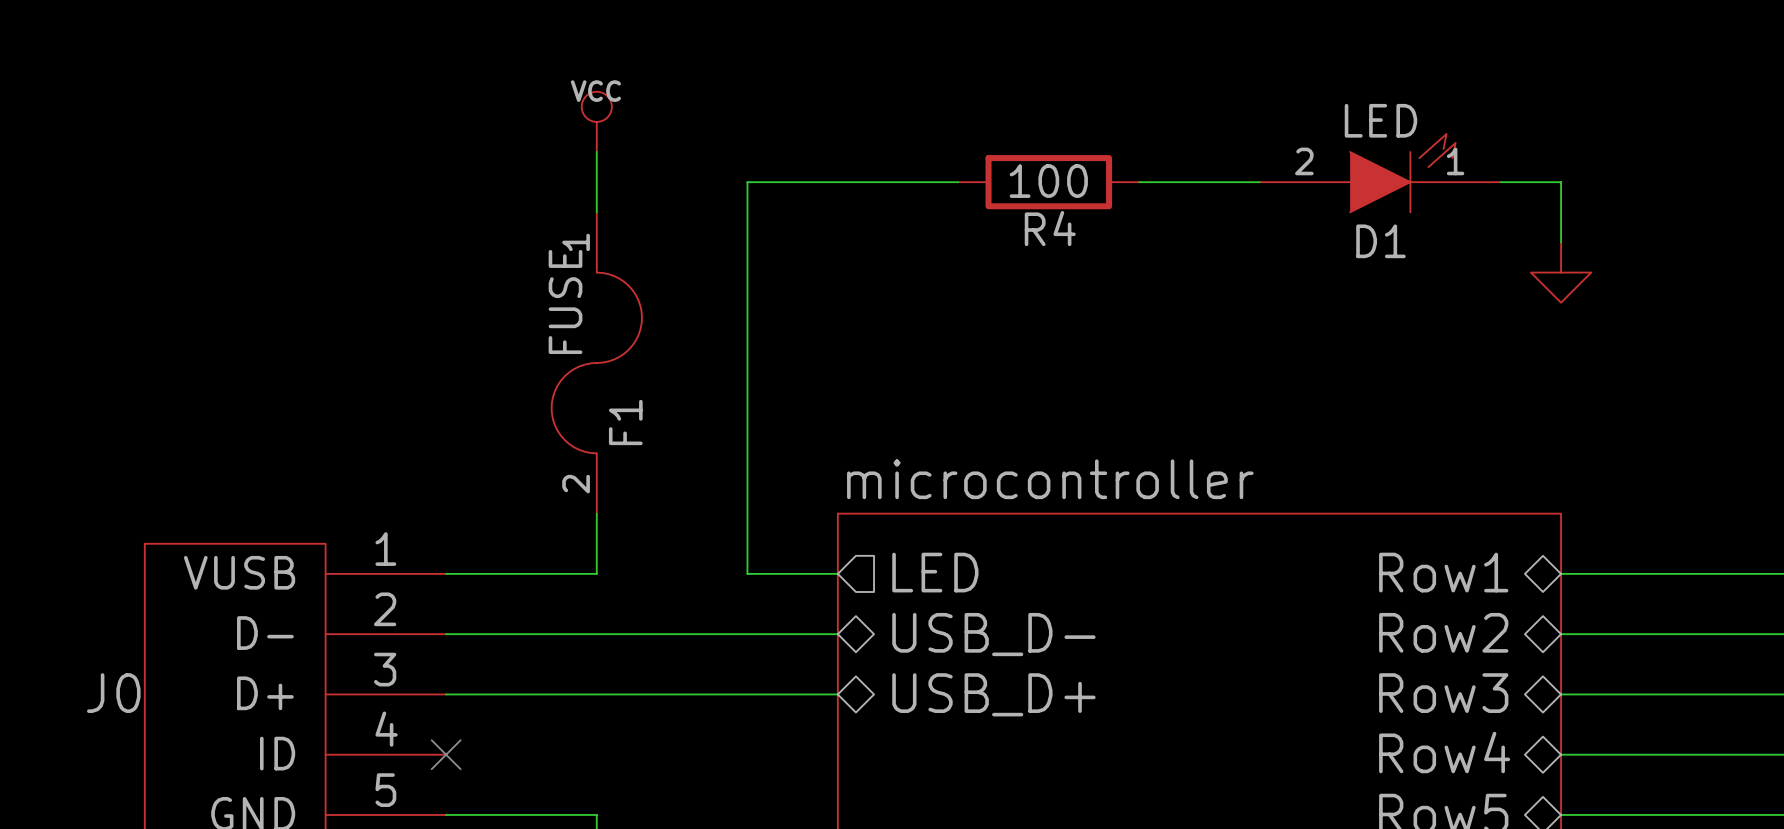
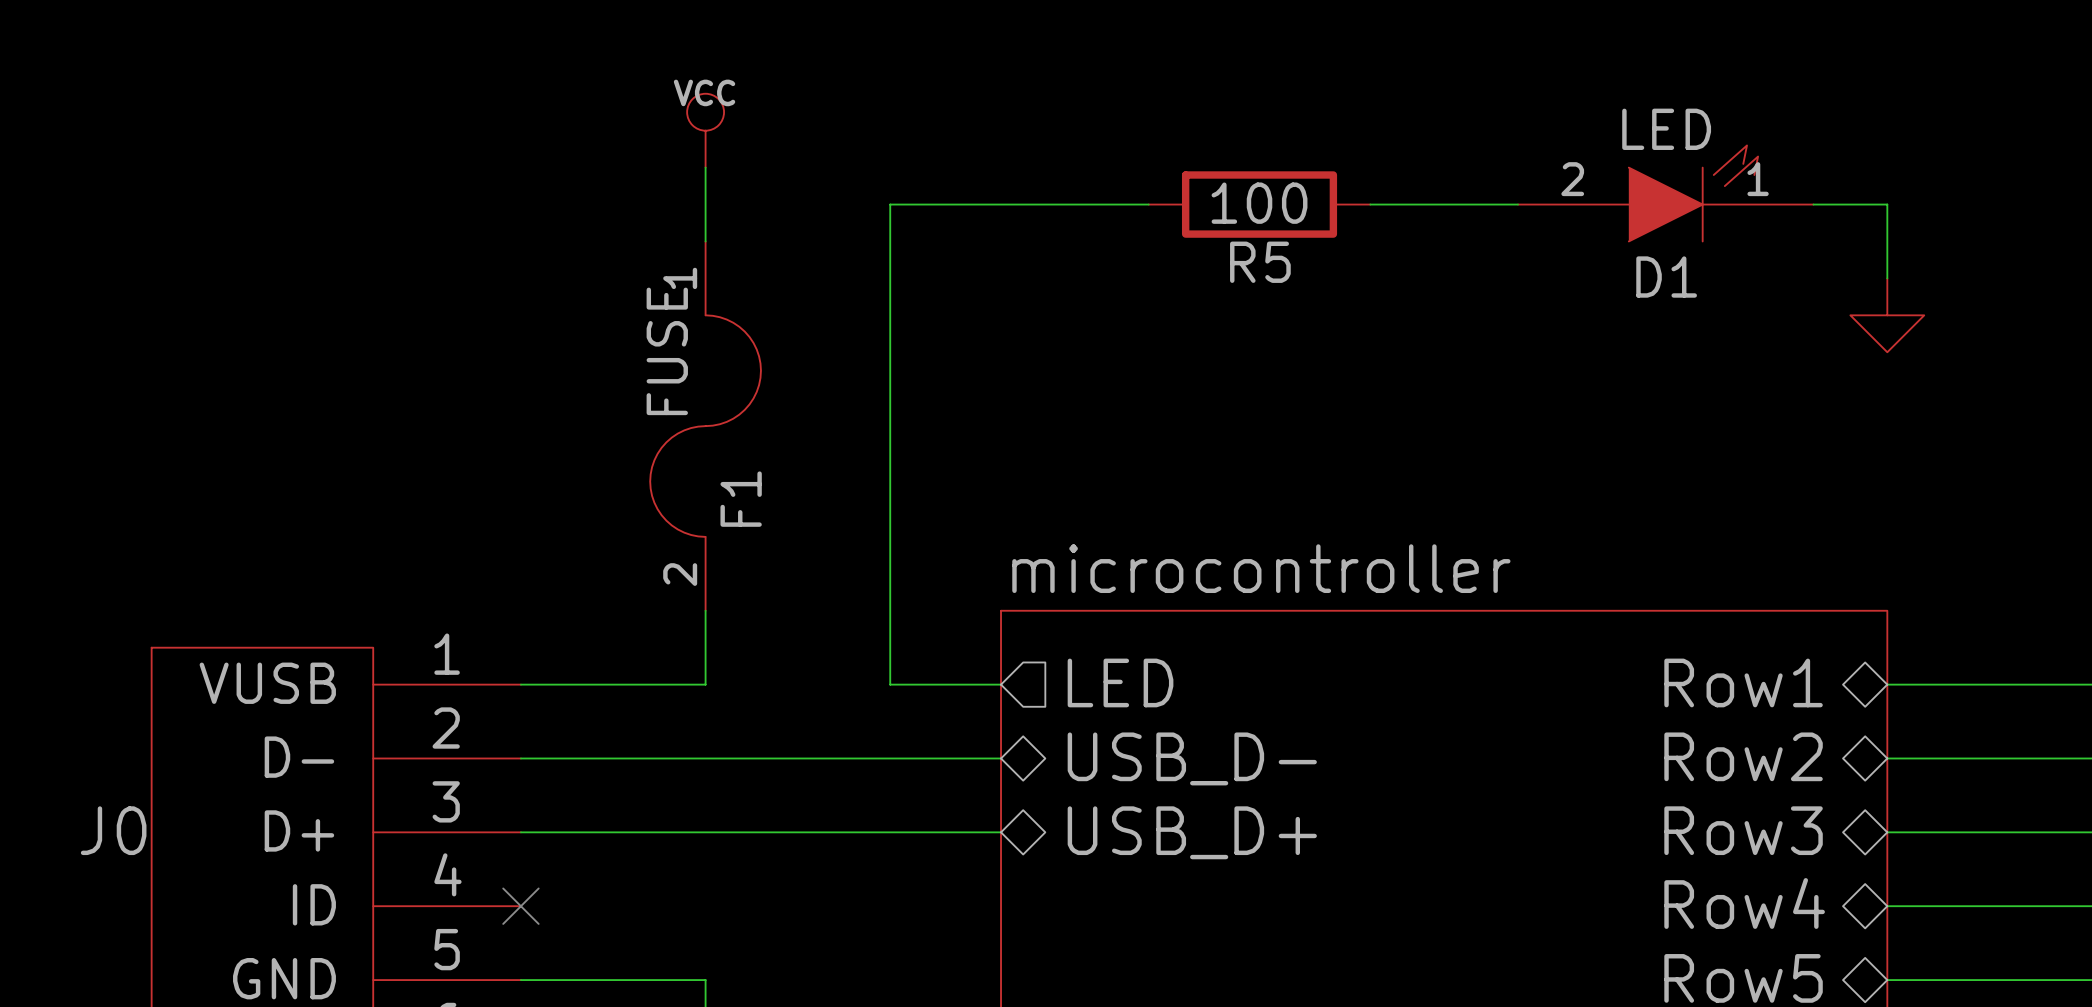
R4 name: R4 (1050, 228) -> R5 (1260, 262)

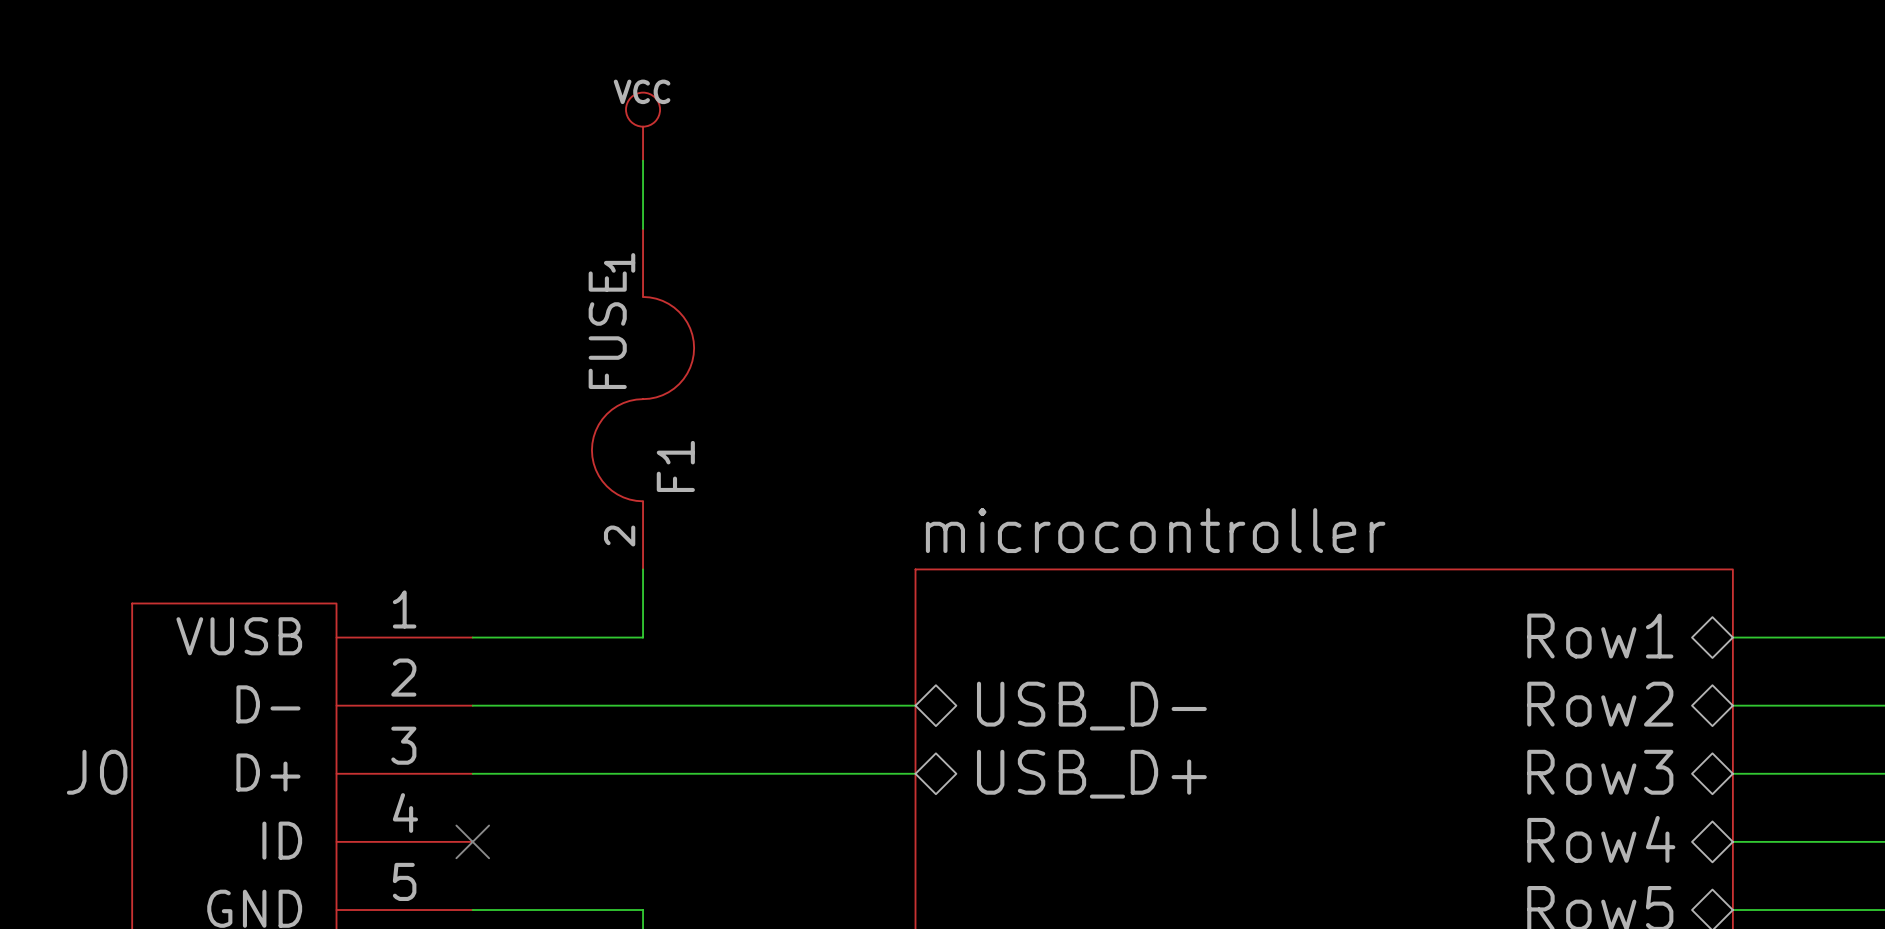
D1: LED (1665, 193) -> none
wire: (1148, 204) (890, 204) (890, 684) (1001, 684) -> none
R5: 100 (1259, 204) -> none
wire: (1370, 204) (1518, 204) -> none
wire: (1813, 204) (1887, 204) (1887, 278) -> none
power symbol: (1887, 315) -> none
sheet pin: LED (1120, 682) -> none

